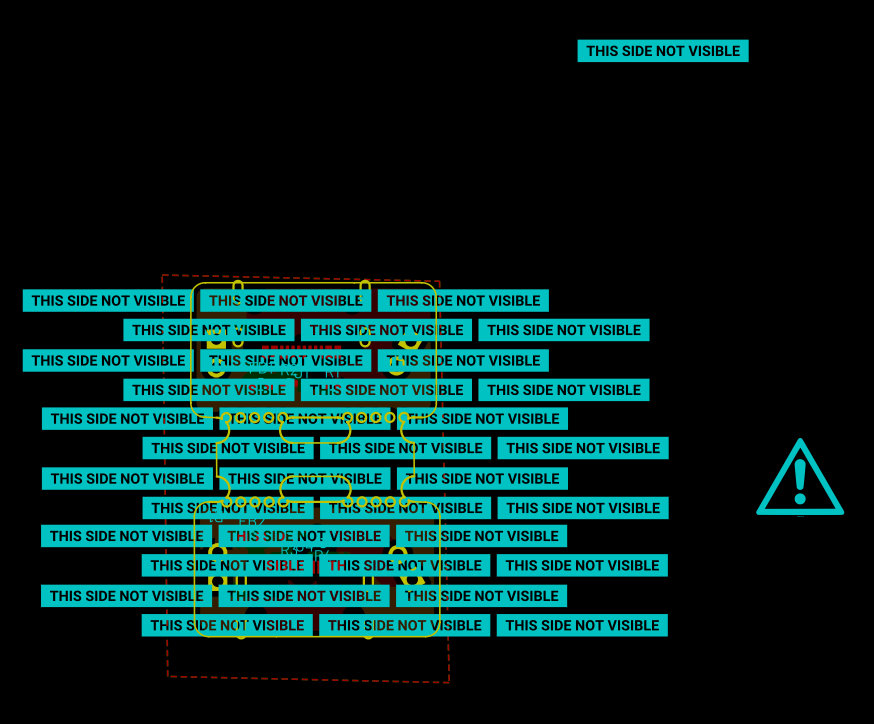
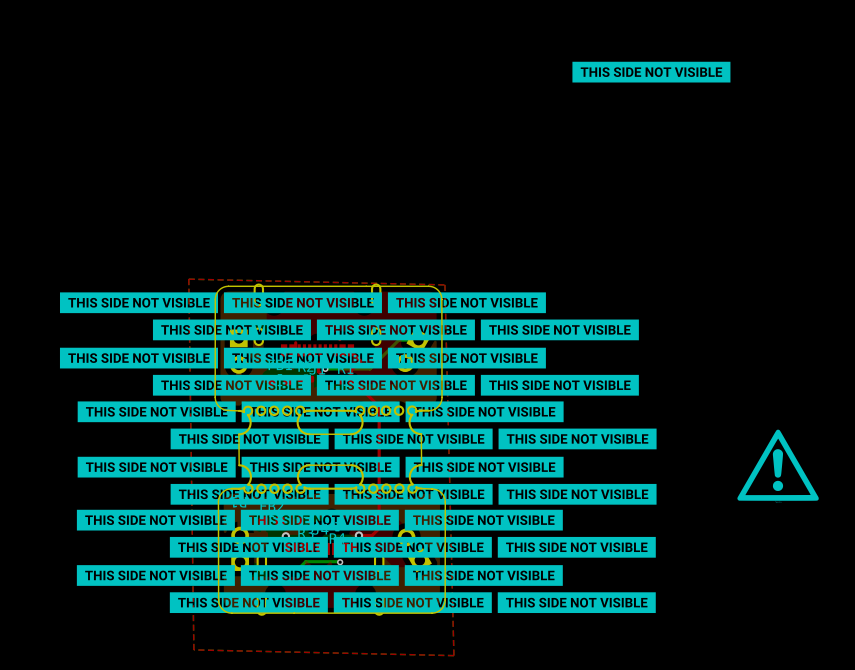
bottom track: none -> (418, 340) (398, 340) (369, 368) (325, 368)
top track: none -> (295, 342) (295, 351)
top track: none -> (351, 351) (360, 361) (351, 370) (351, 381) (353, 381) (379, 406) (379, 528) (372, 535) (358, 535) (355, 539) (355, 547)
top track: none -> (319, 363) (318, 371) (325, 377)
via: none -> (325, 368)
via: none -> (358, 535)
via: none -> (285, 536)
bottom track: none -> (340, 562) (305, 561) (298, 569)
via: none -> (340, 562)

